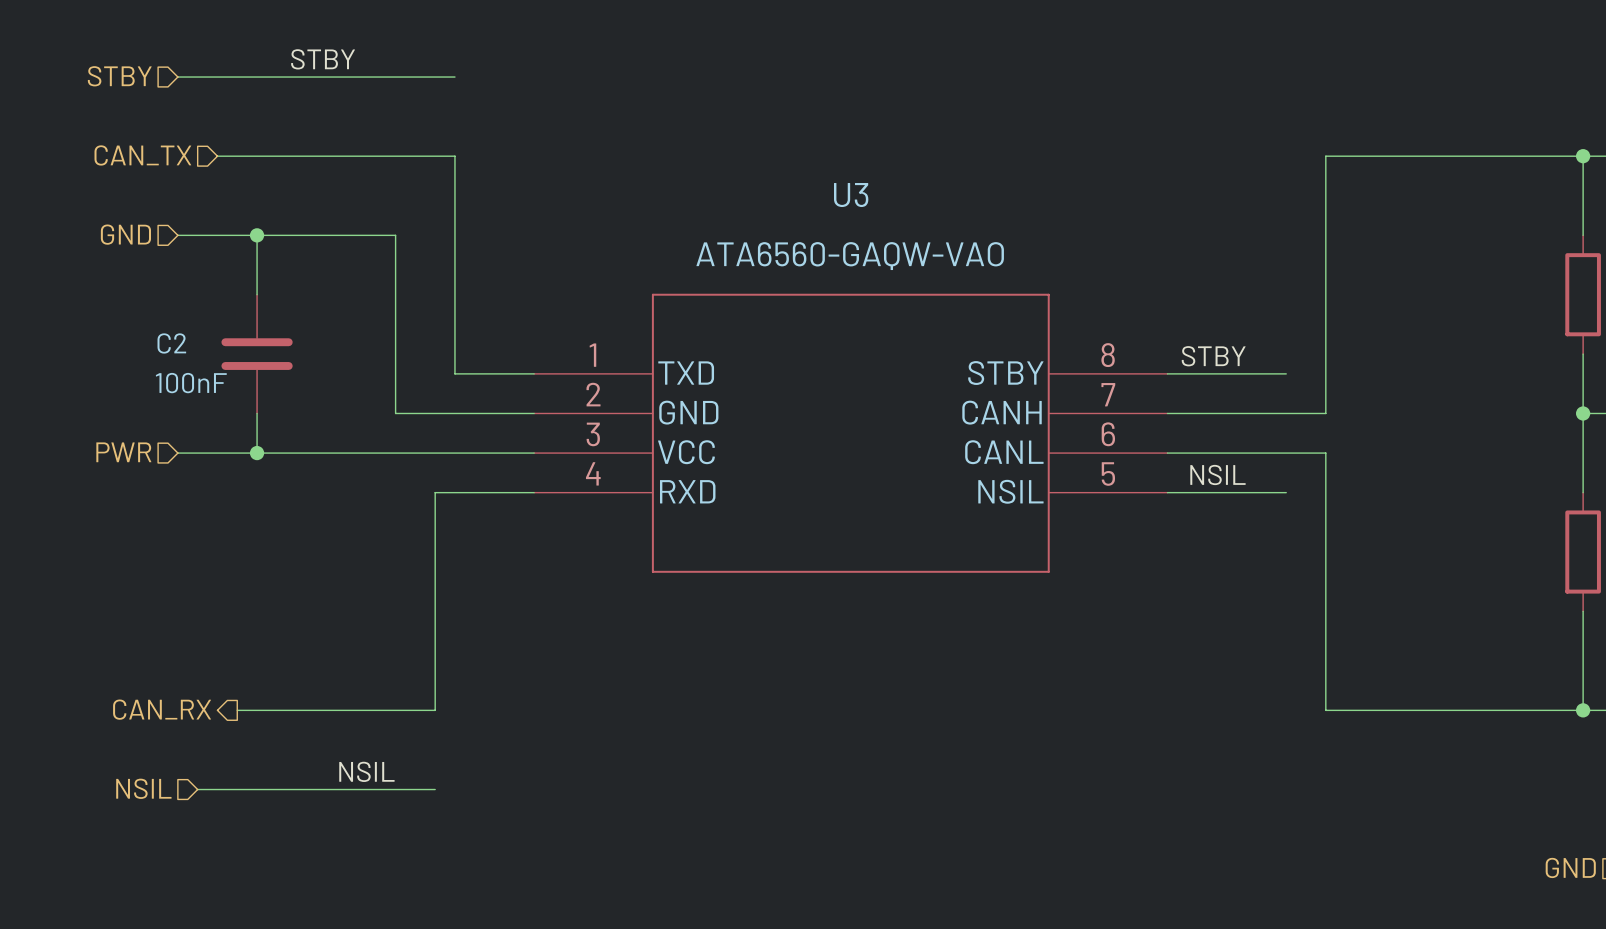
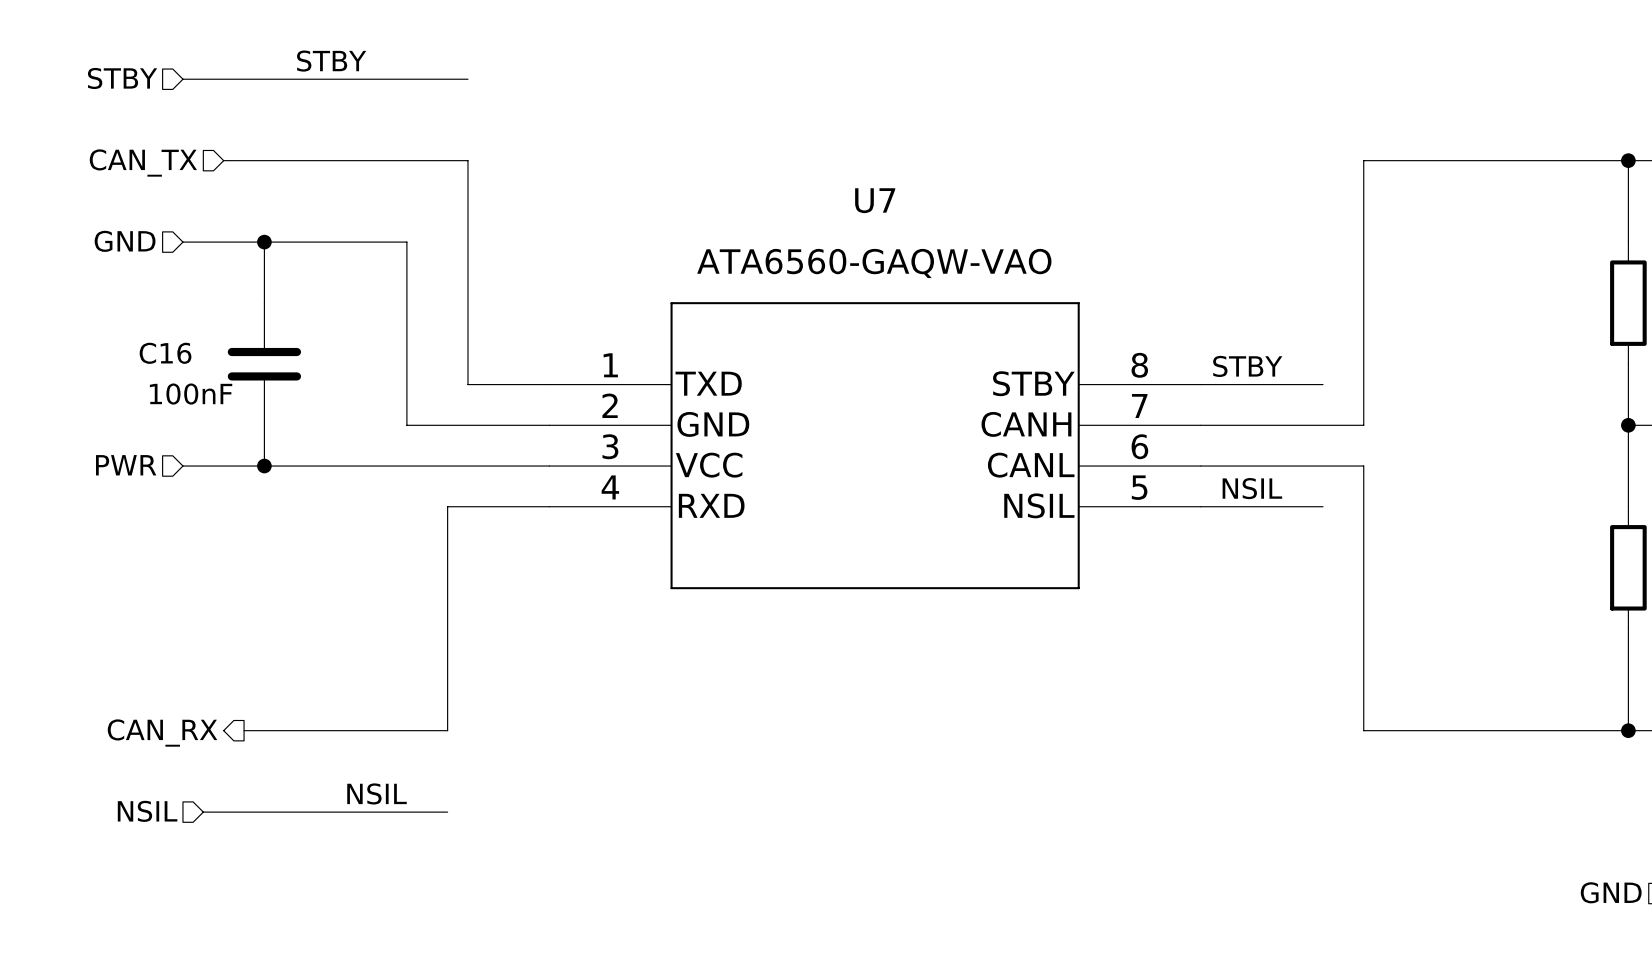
U3 name: U3 (851, 195) -> U7 (875, 200)
C2 name: C2 (171, 343) -> C16 (165, 353)

